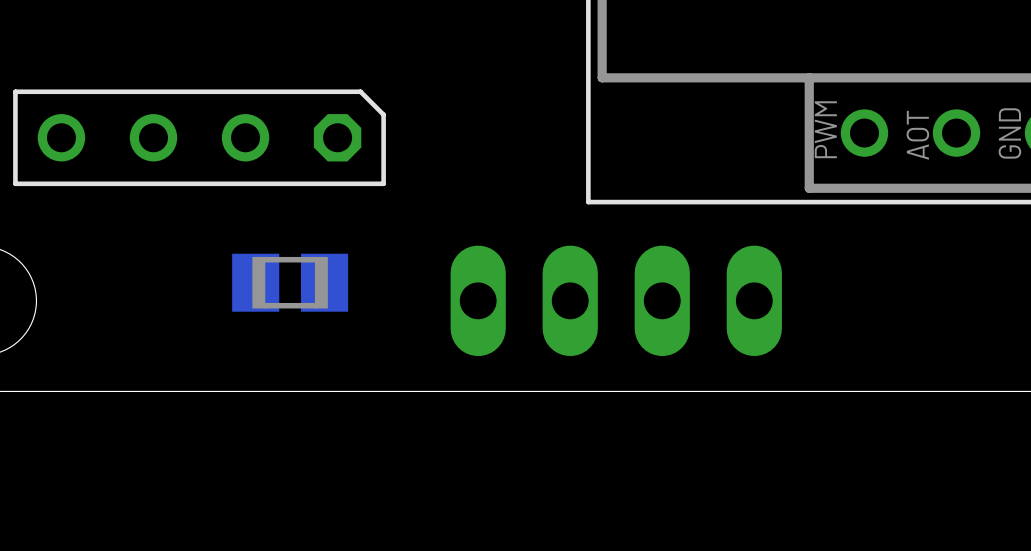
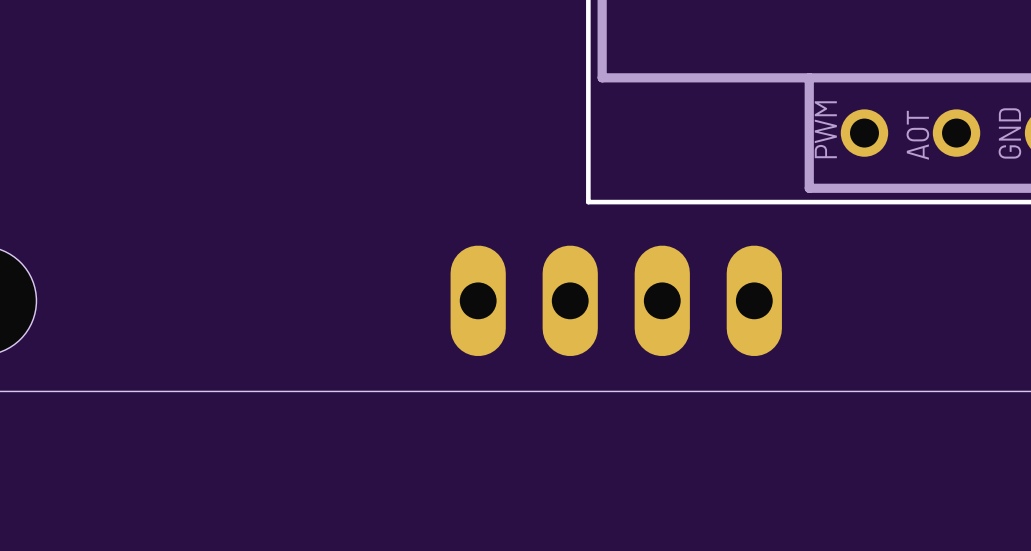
part: (199, 137) -> none
part: (290, 282) -> none

